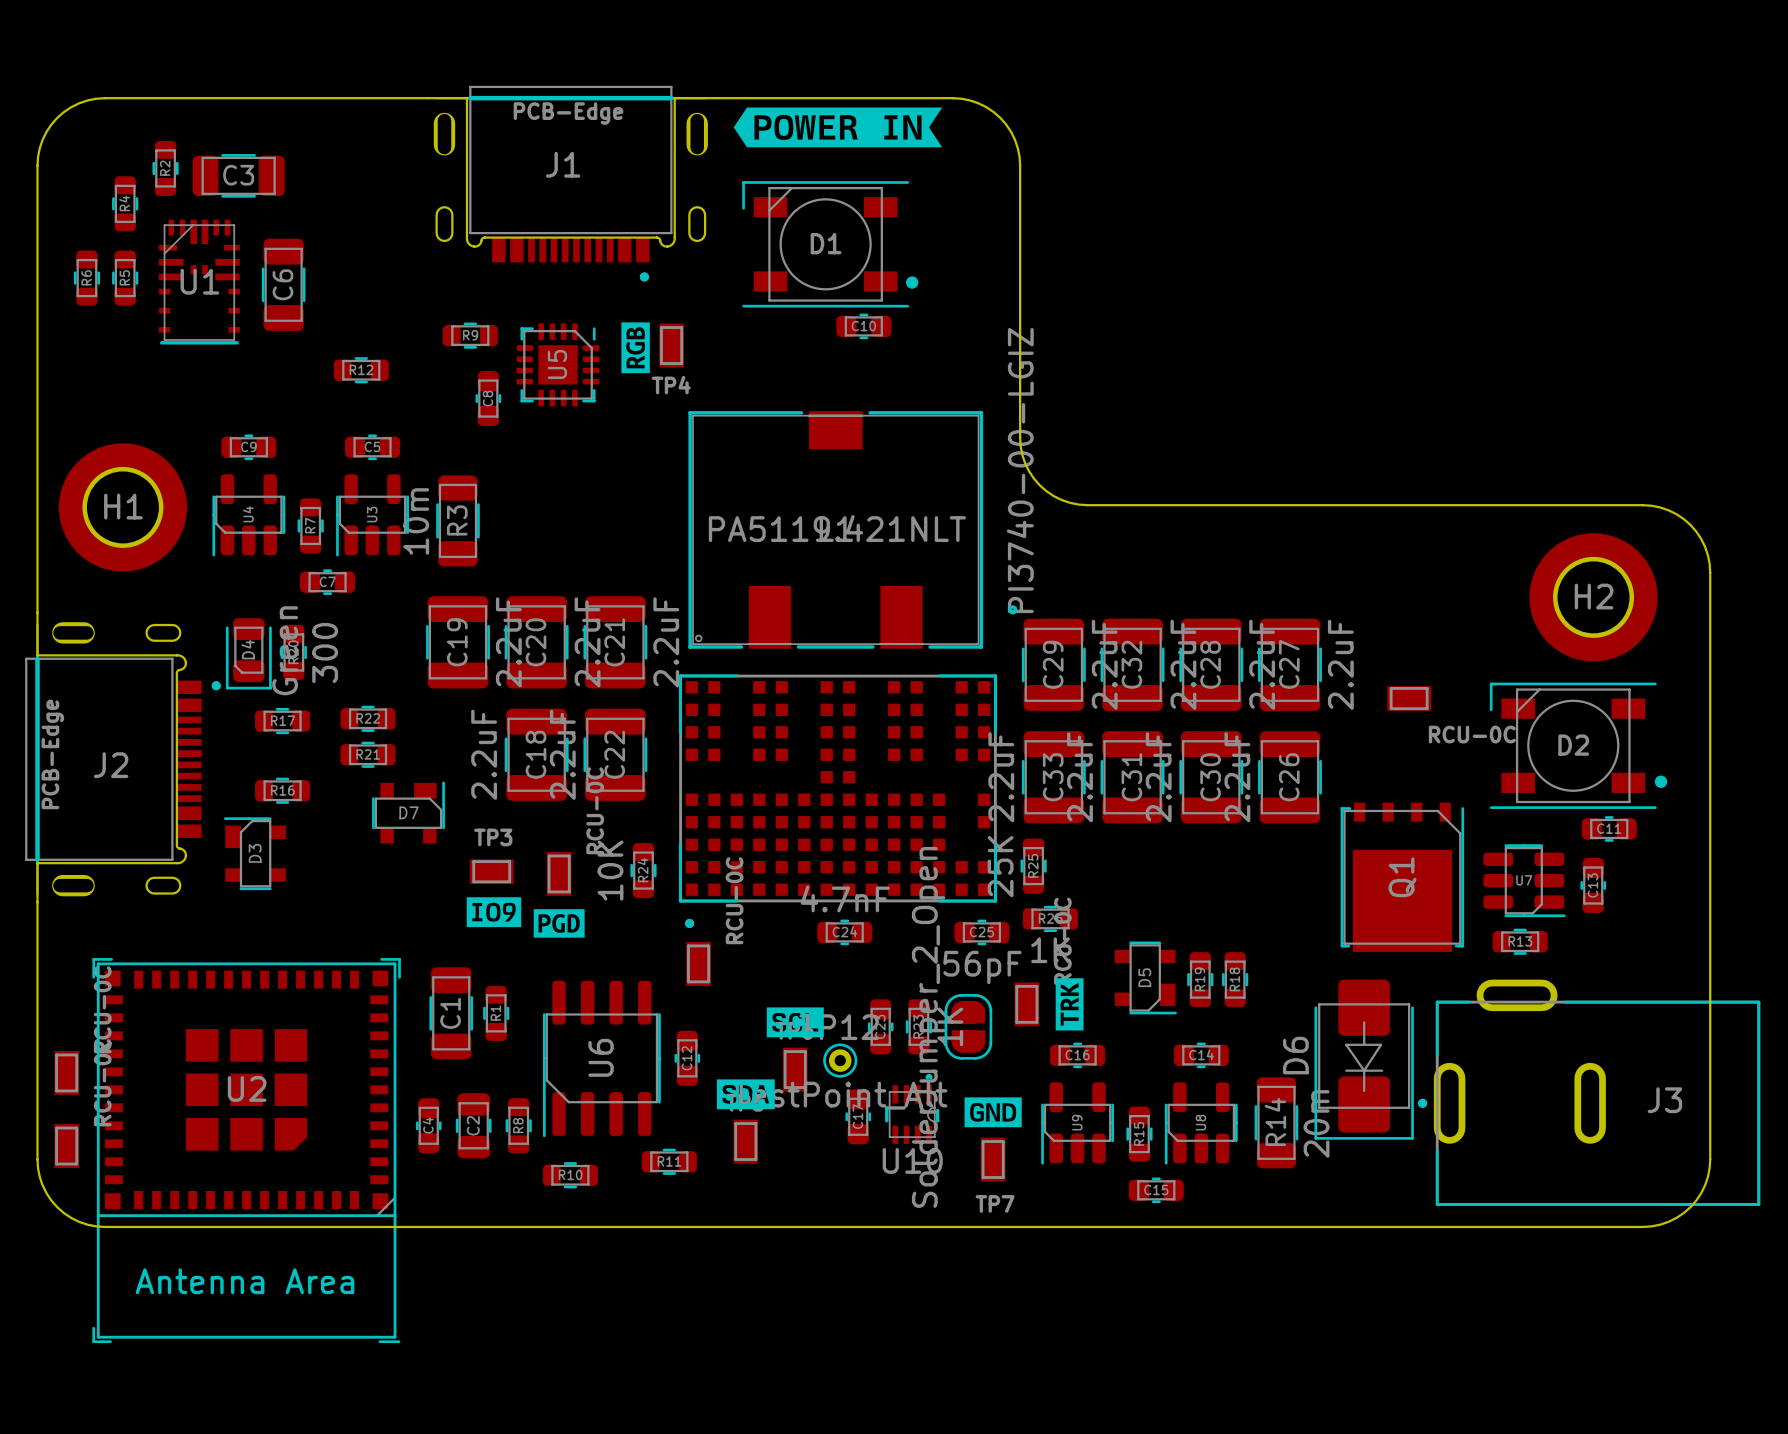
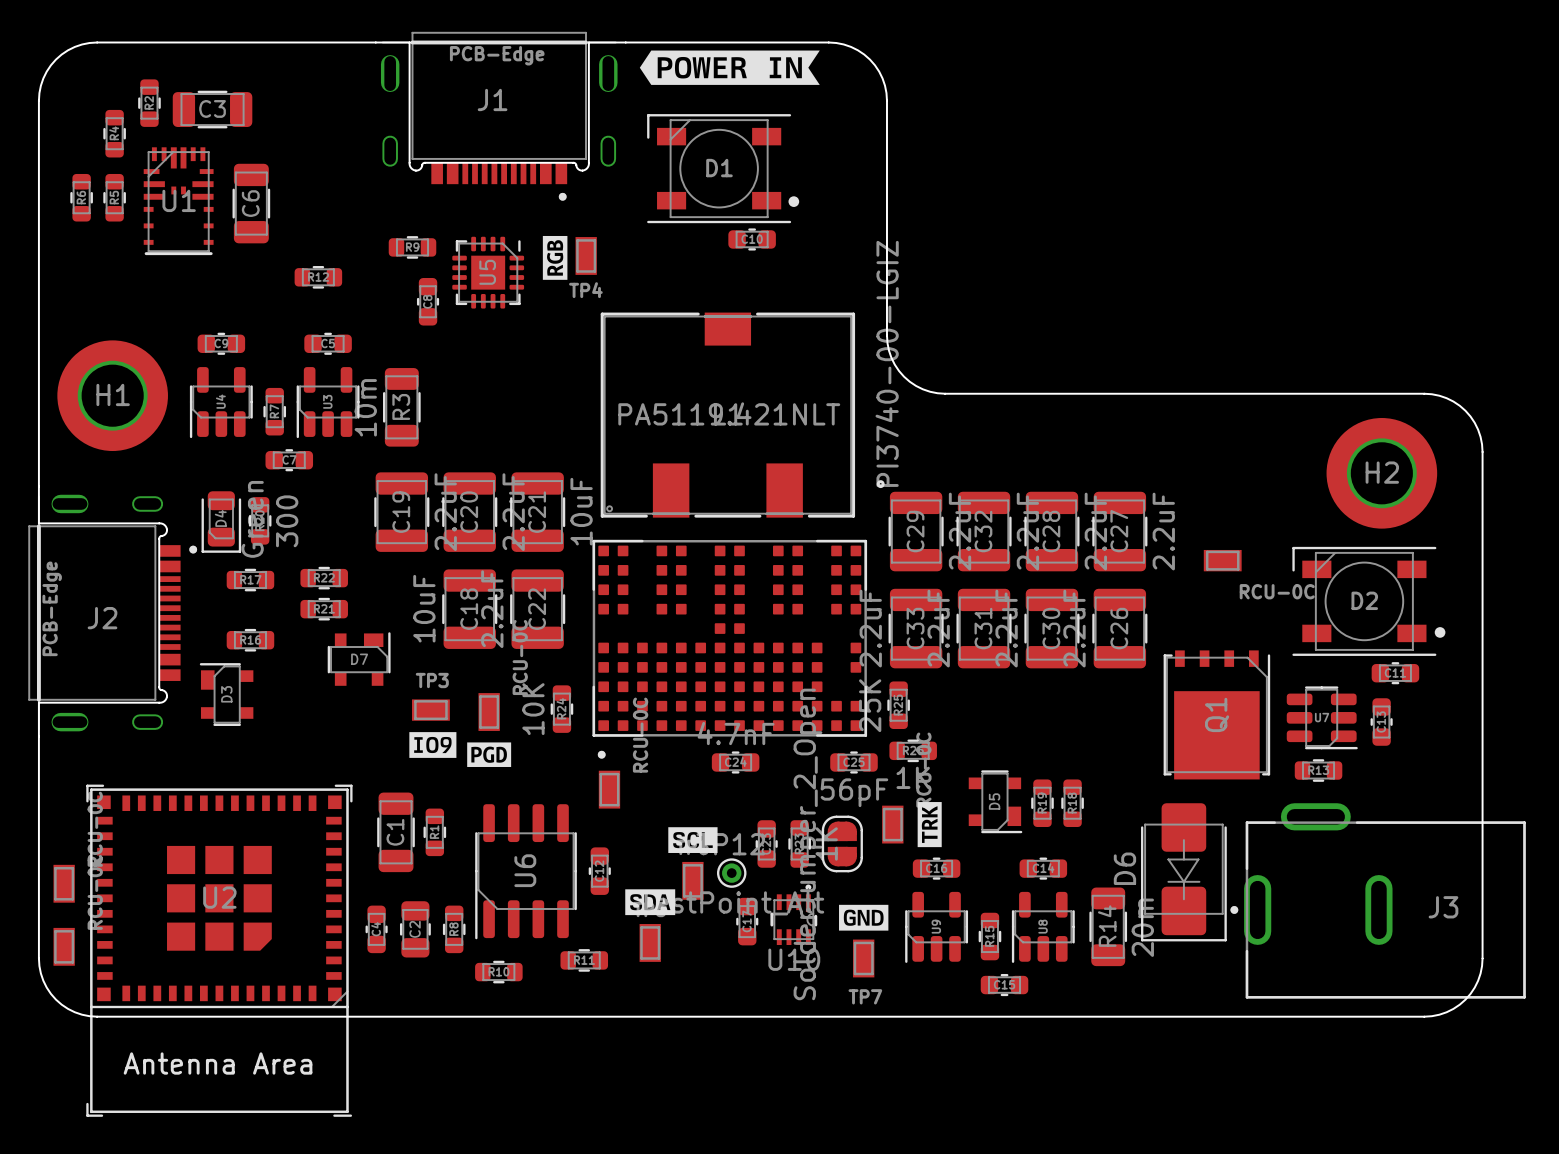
C21 value: 2.2uF (666, 642) -> 10uF (581, 511)
C18 value: 2.2uF (484, 754) -> 10uF (424, 608)

